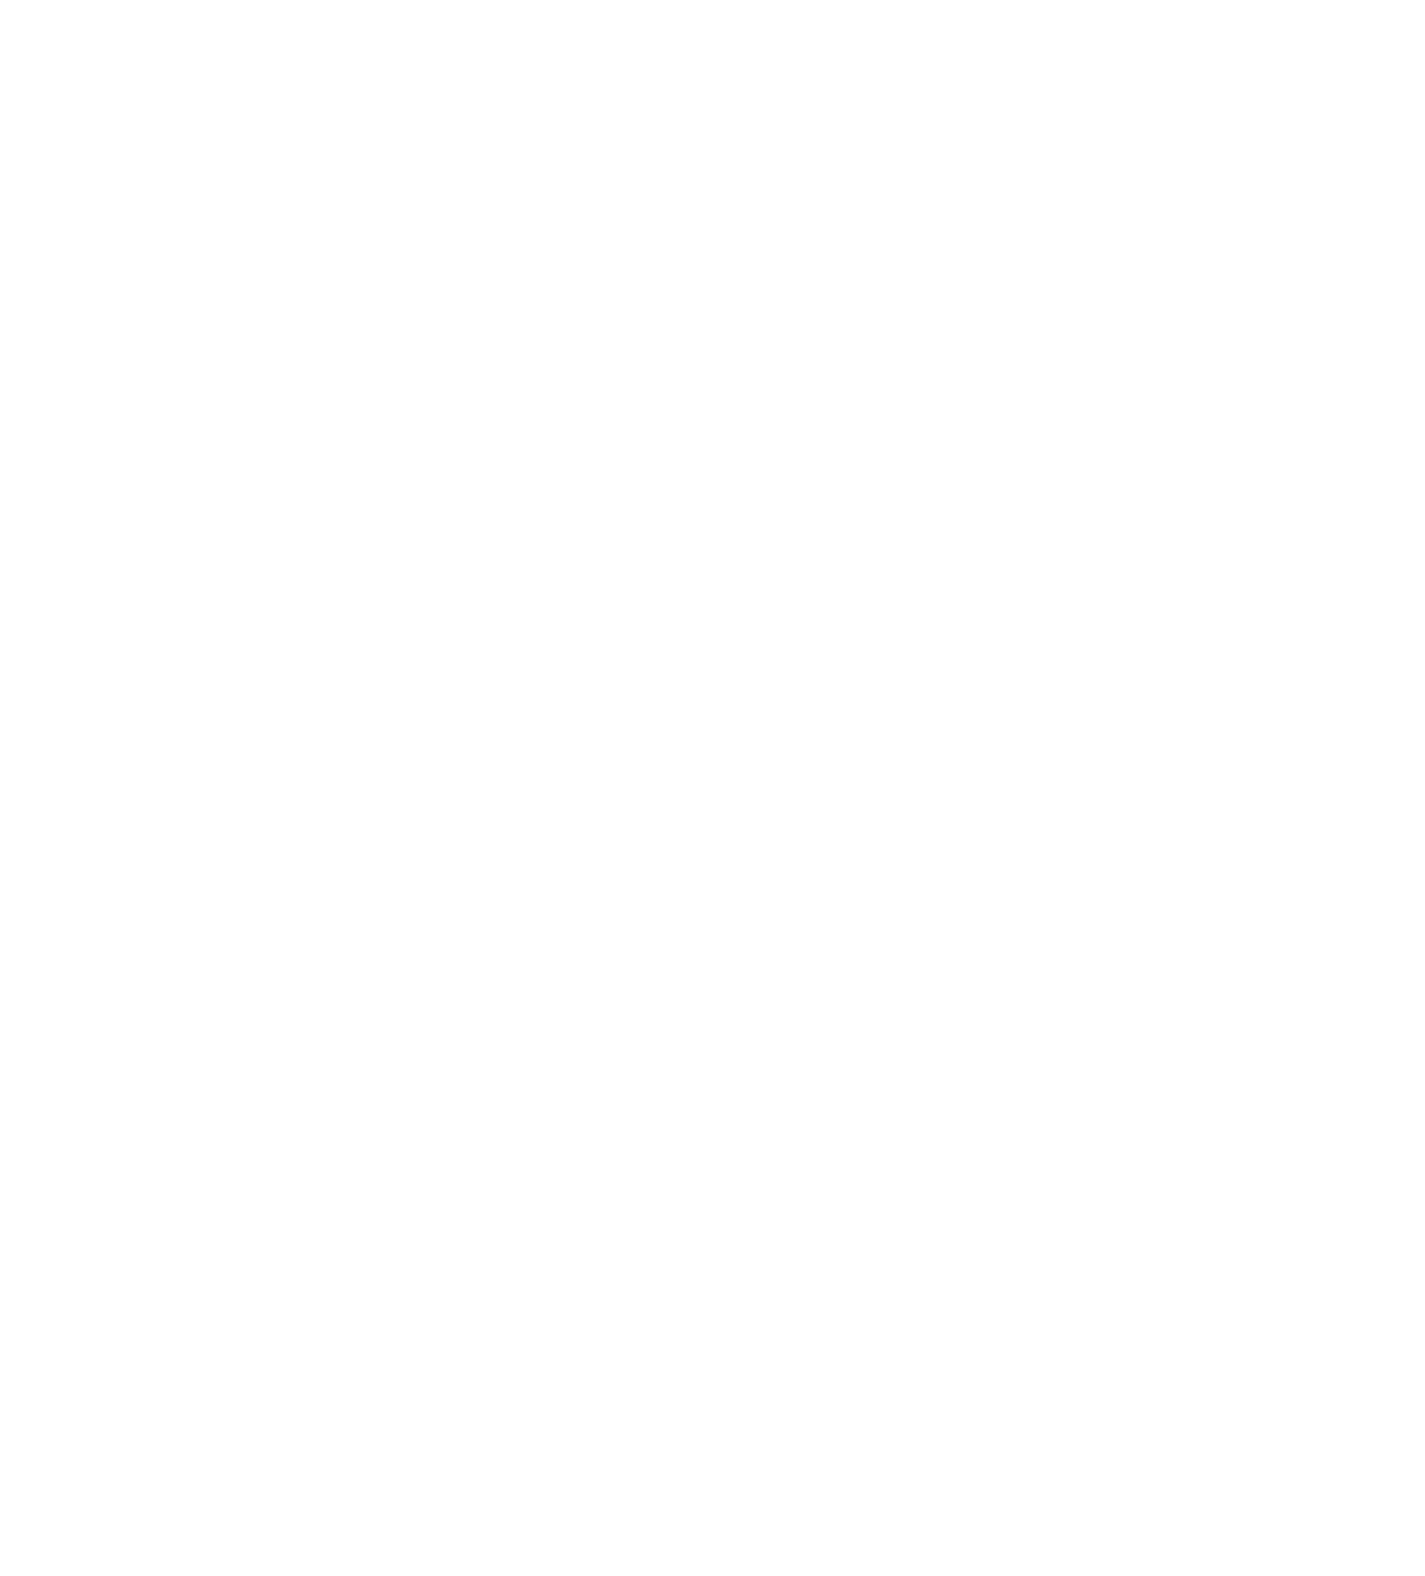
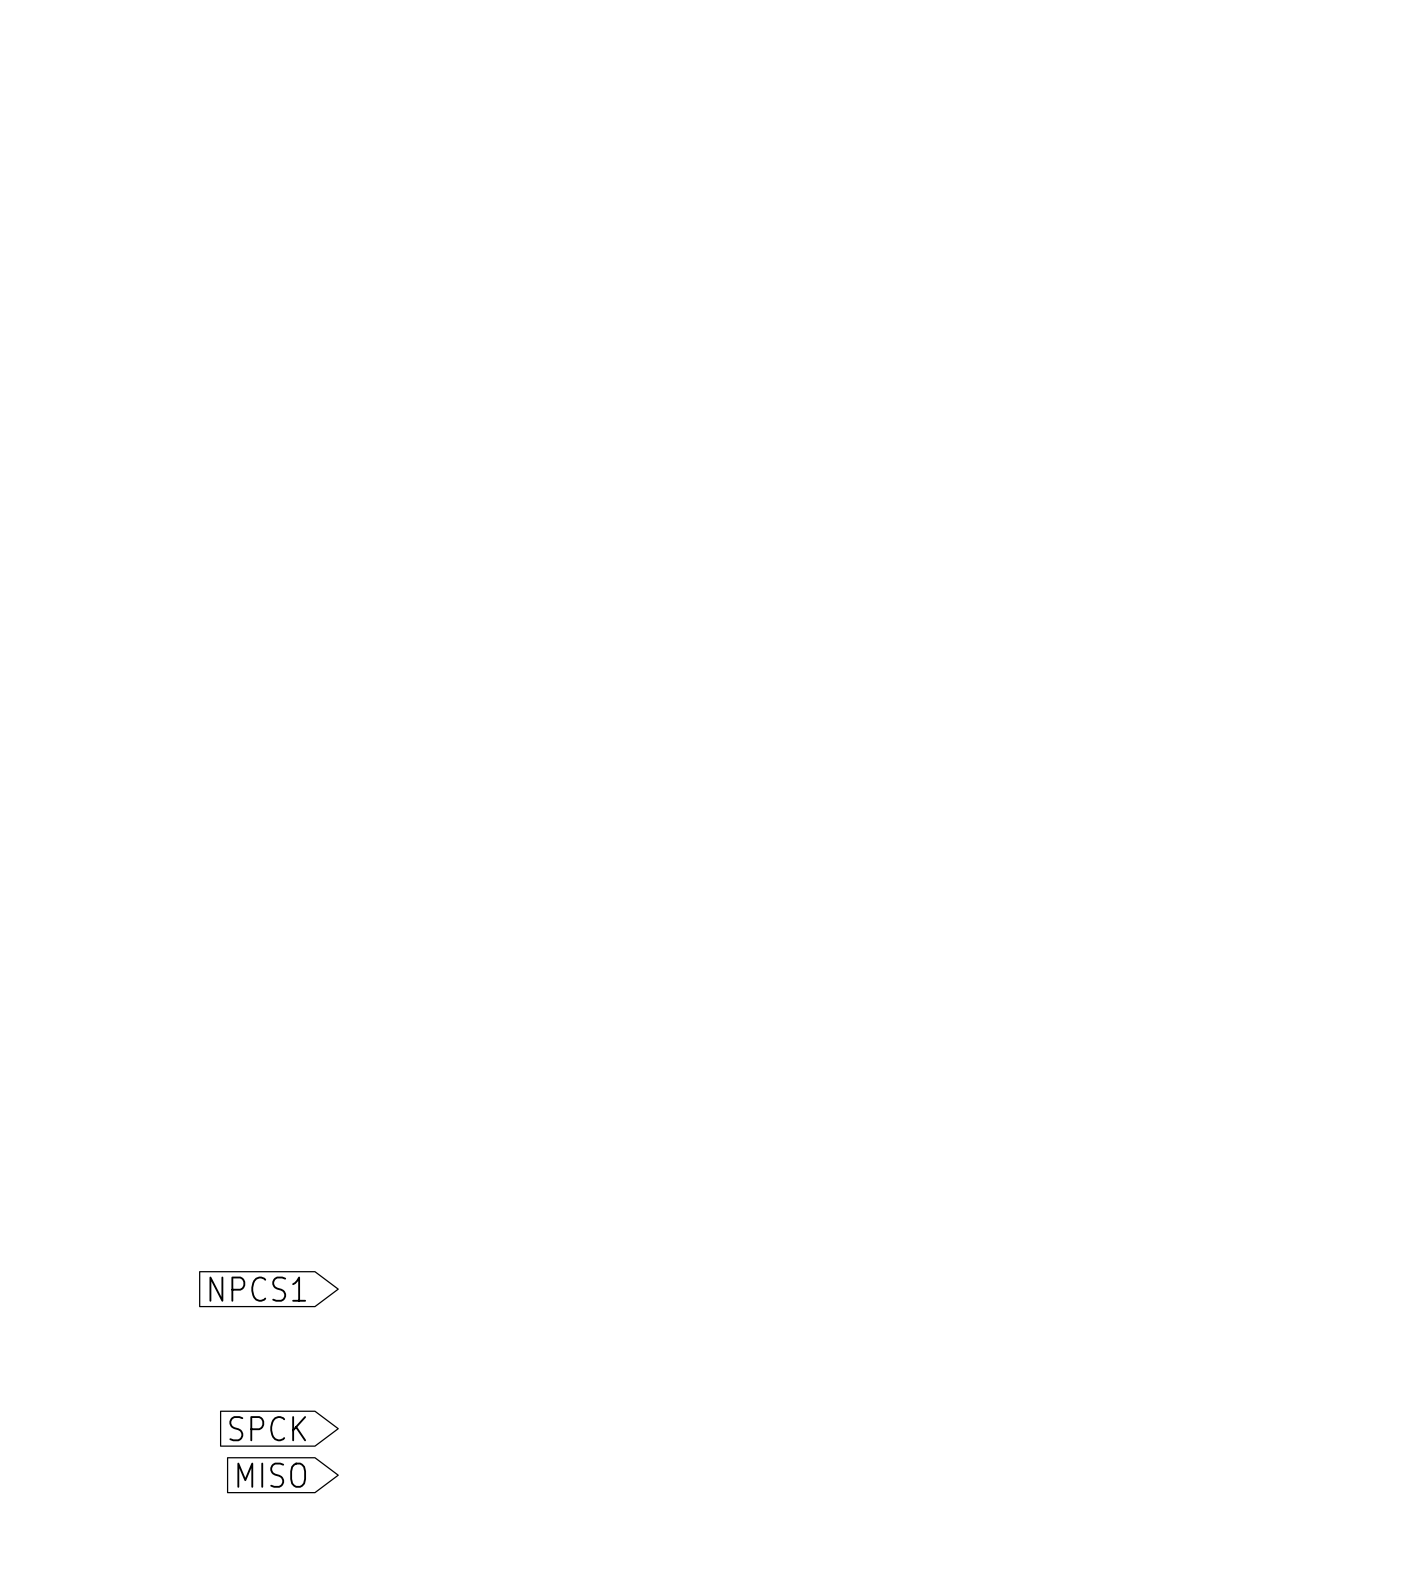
global label: none -> NPCS1 (257, 1289)
global label: none -> SPCK (267, 1428)
global label: none -> MISO (271, 1475)

